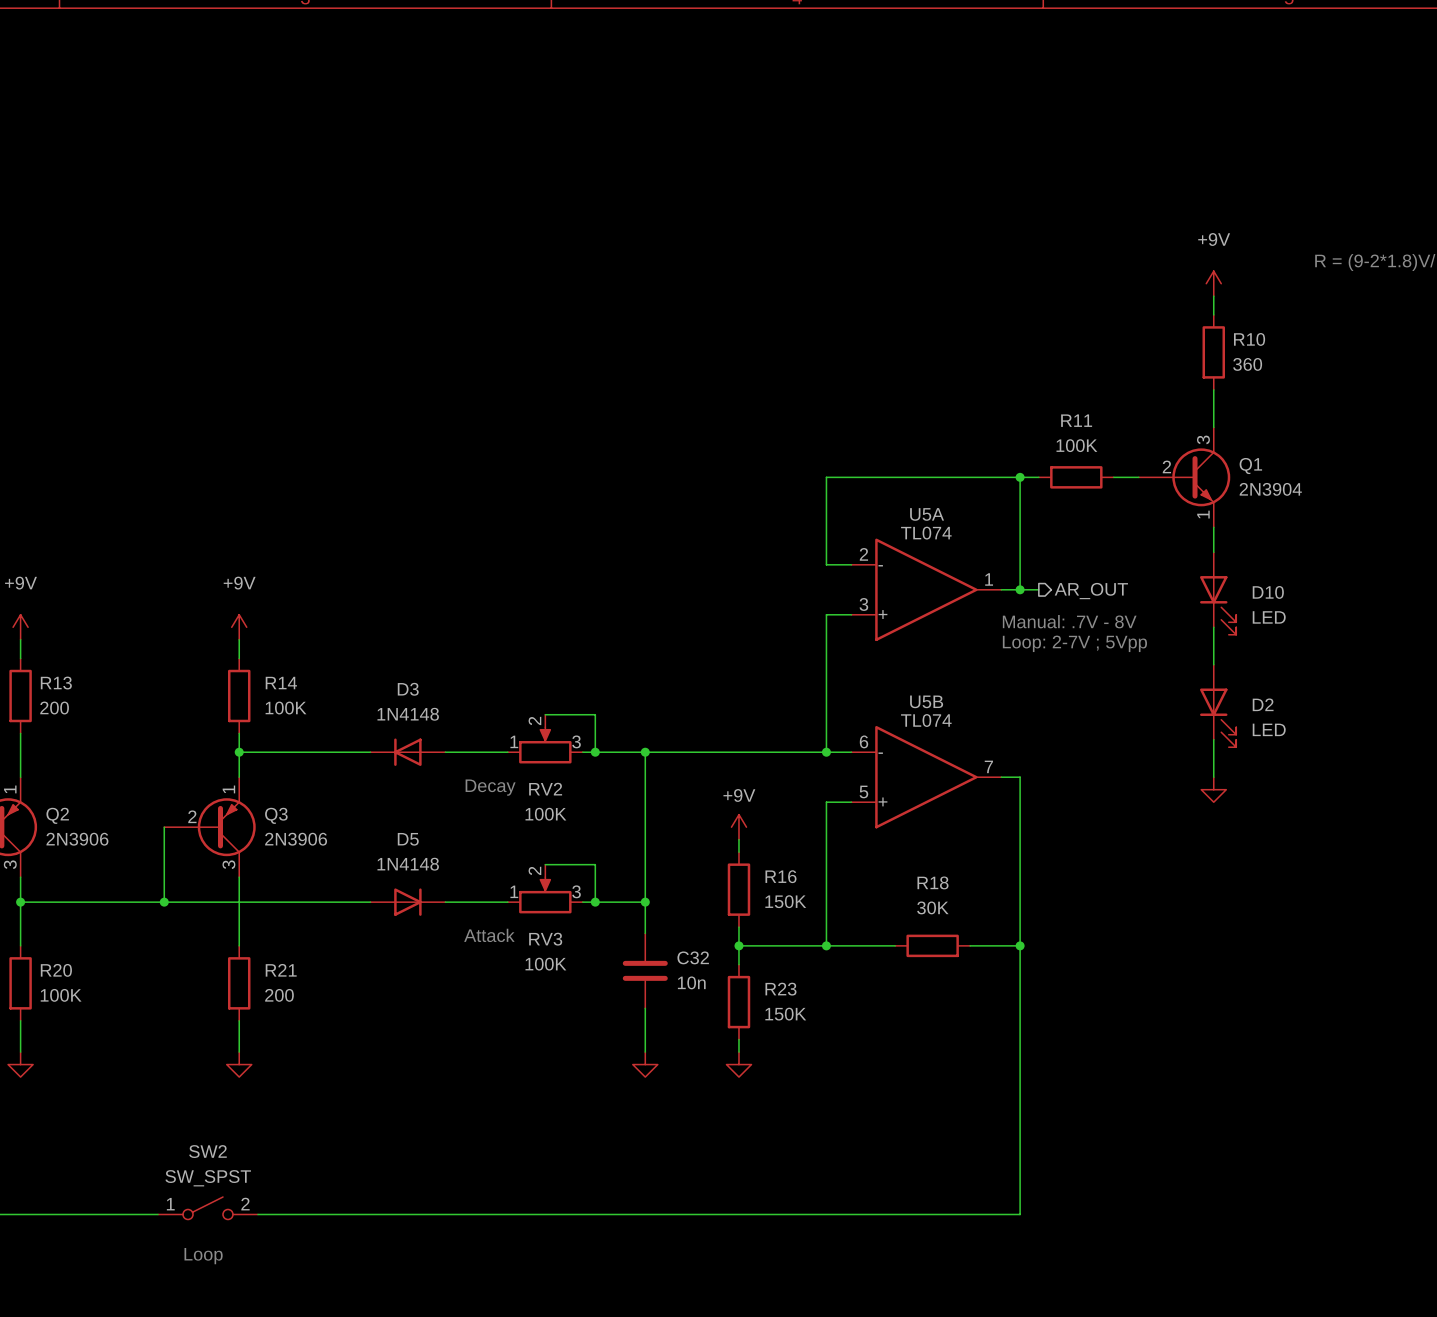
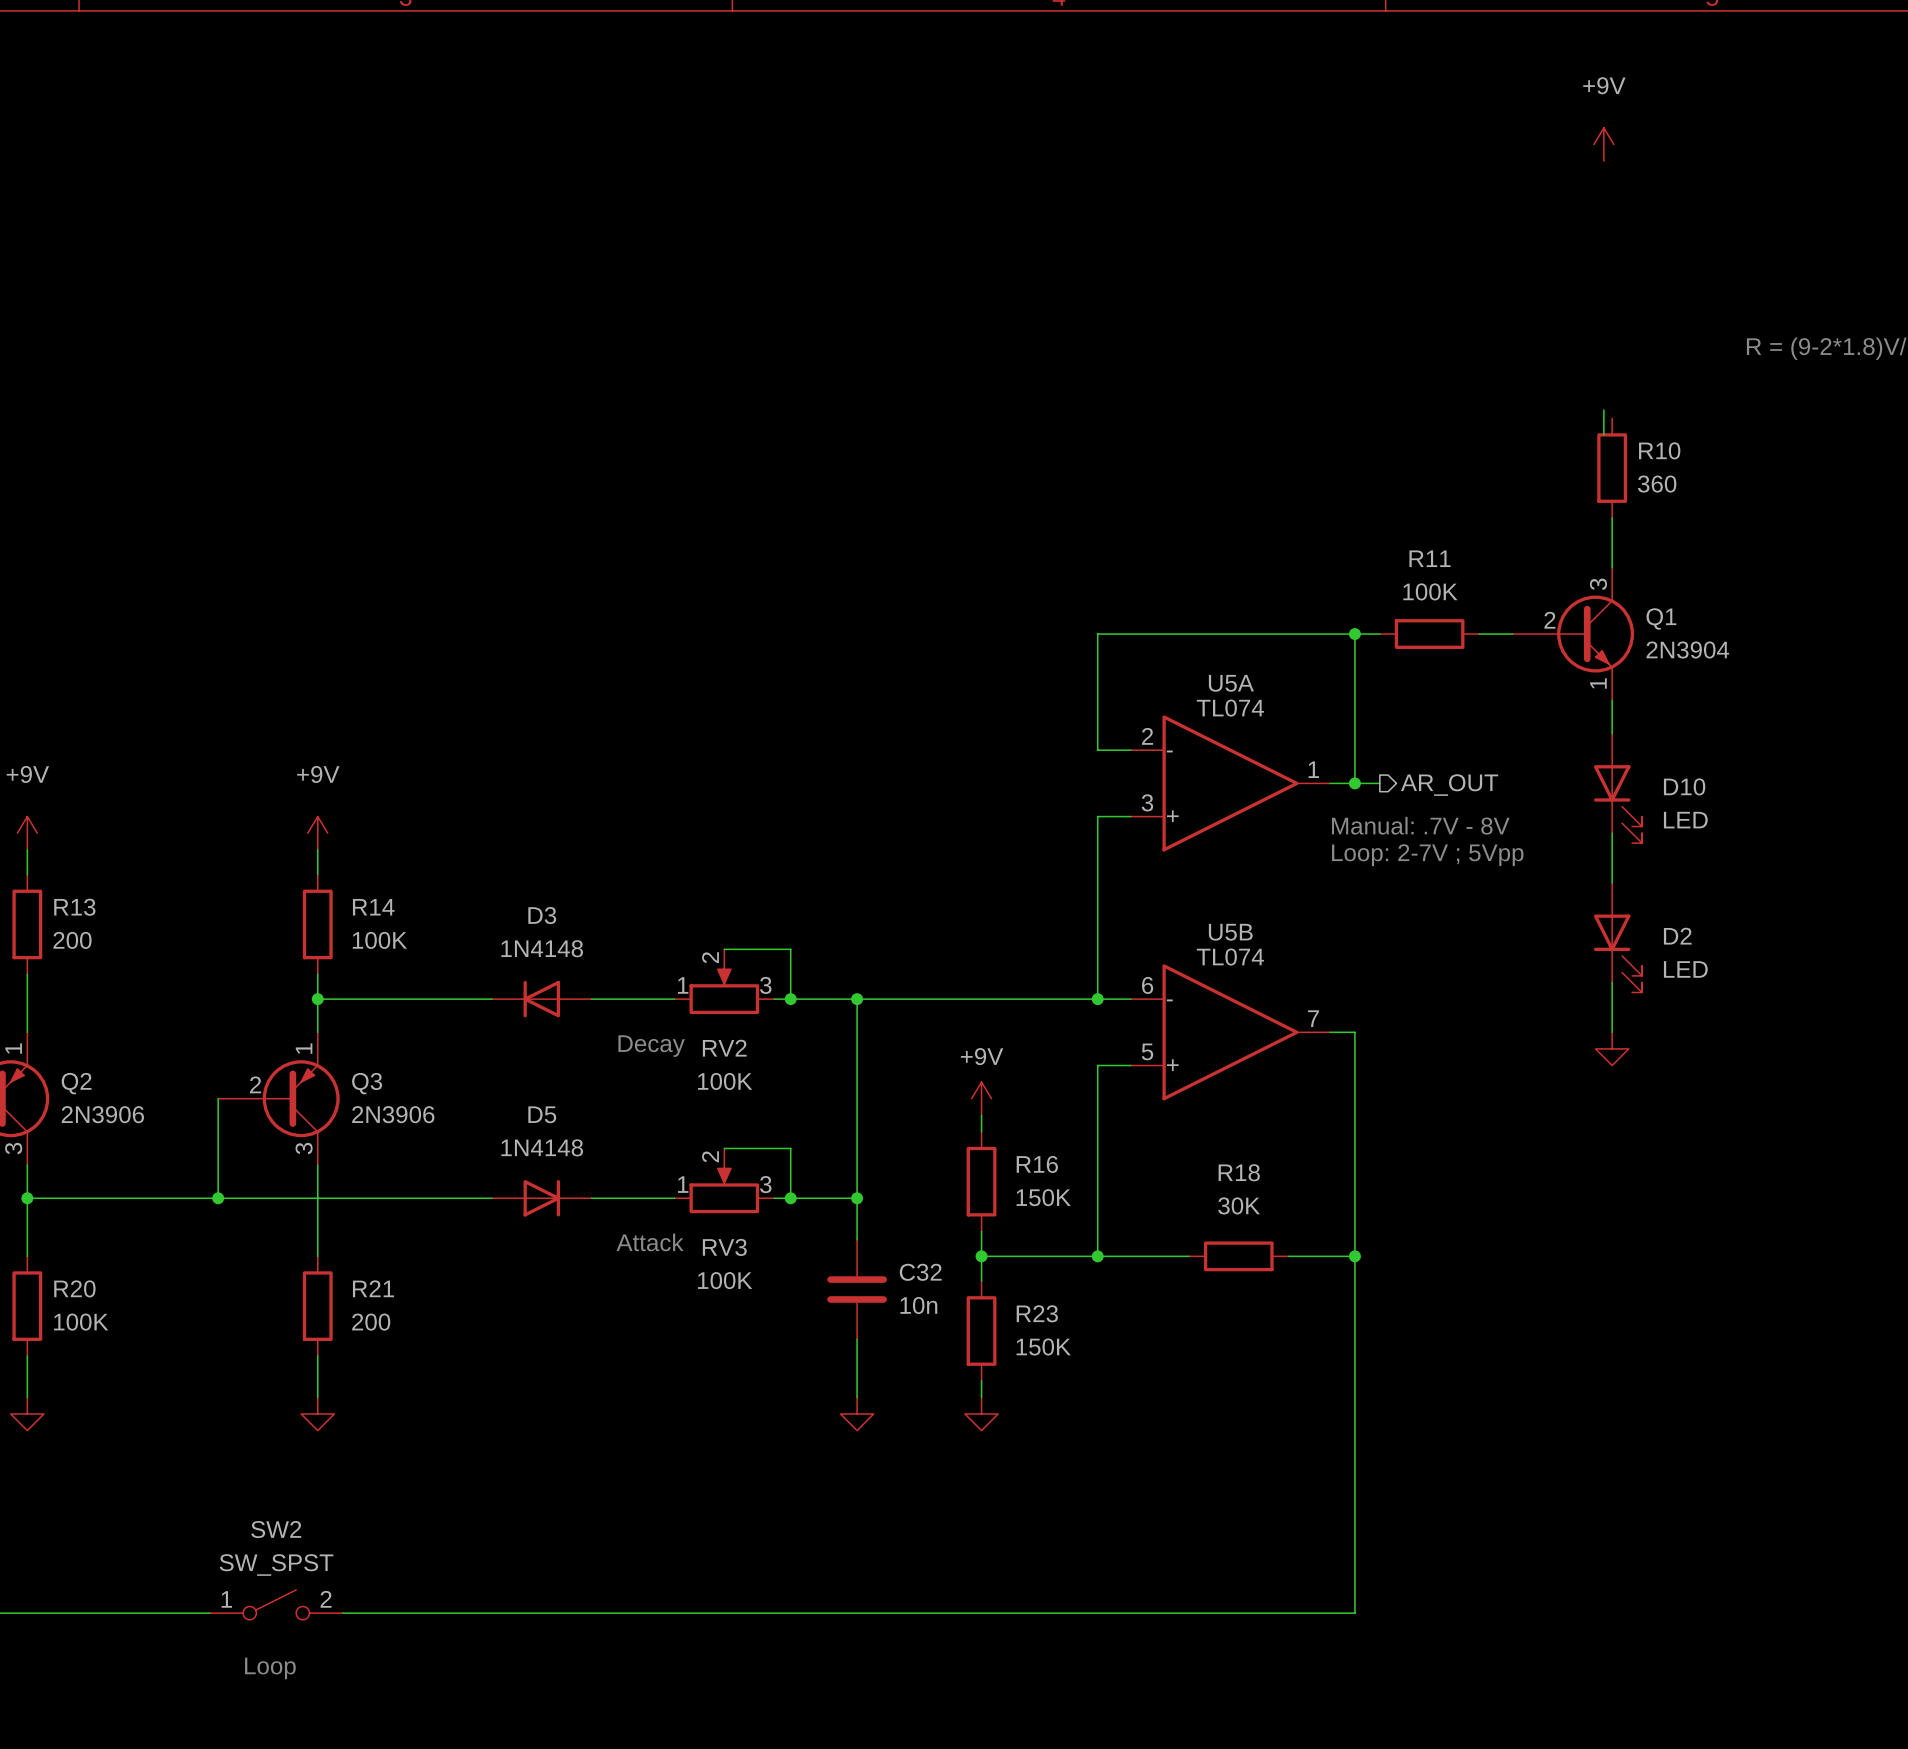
power symbol position: +9V (1213, 283) -> +9V (1603, 144)
wire: (1213, 296) (1213, 314) -> (1603, 410) (1603, 434)

